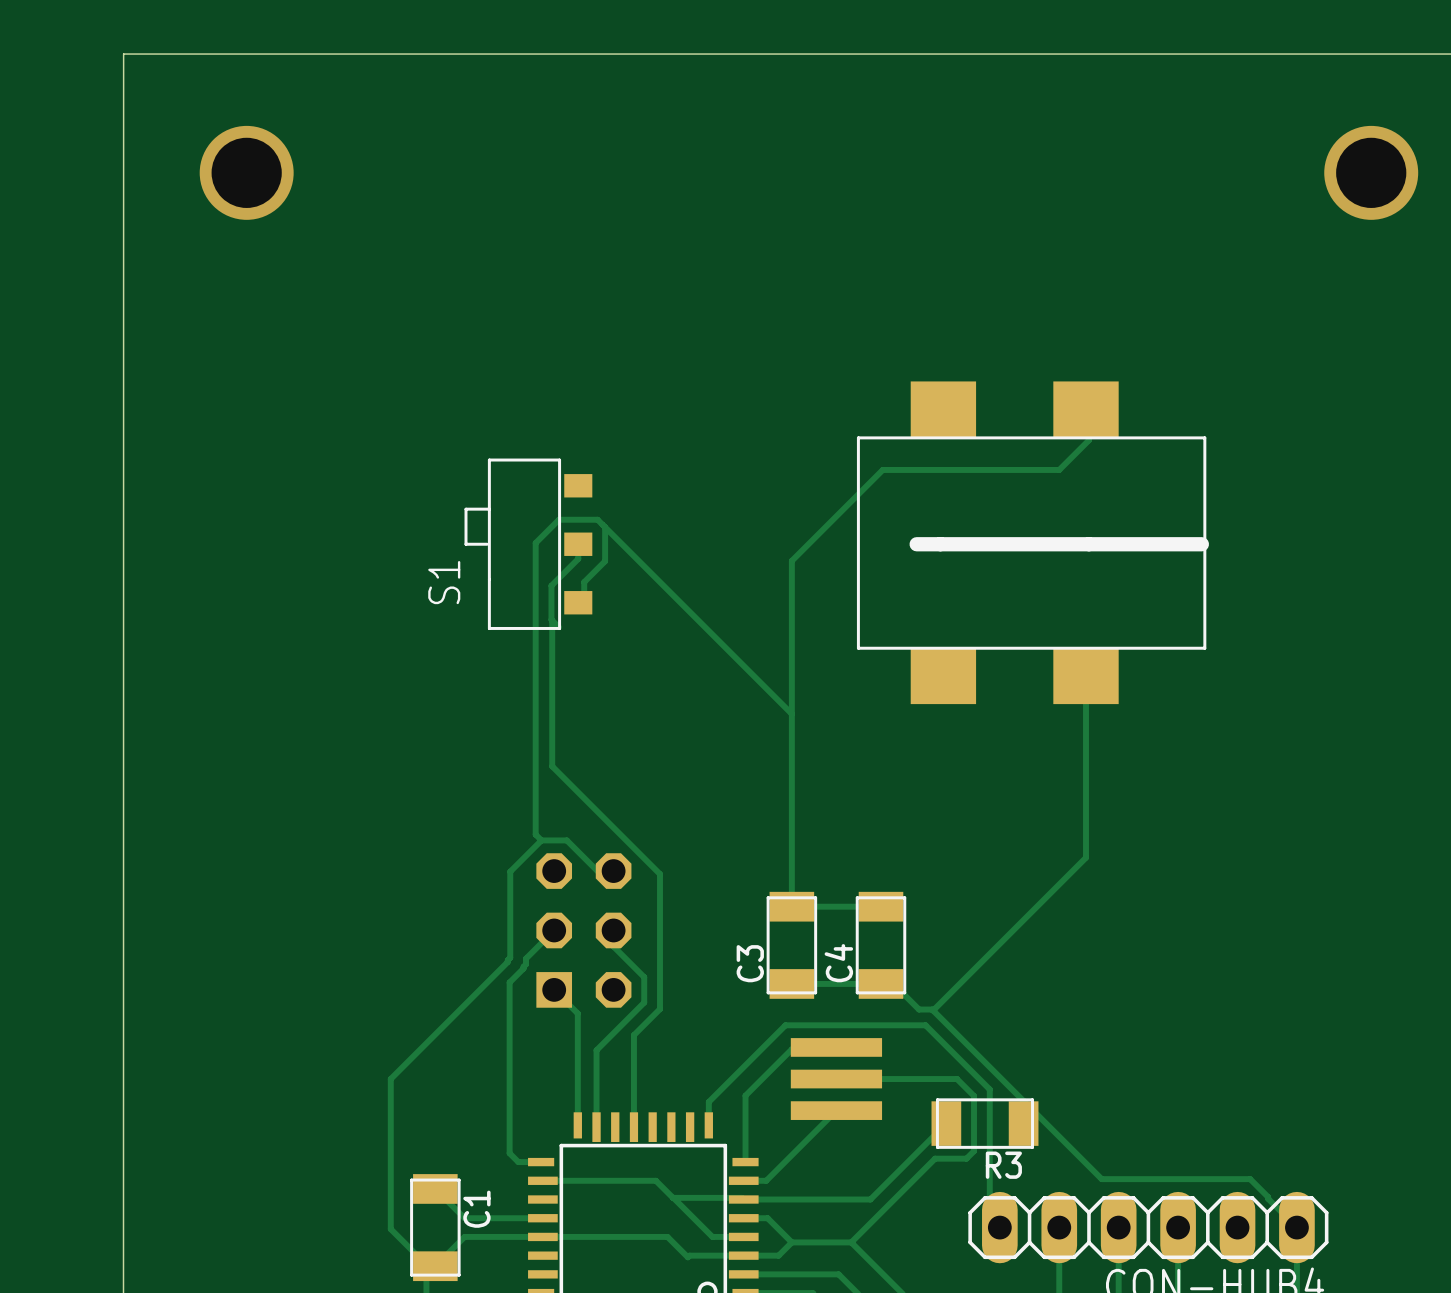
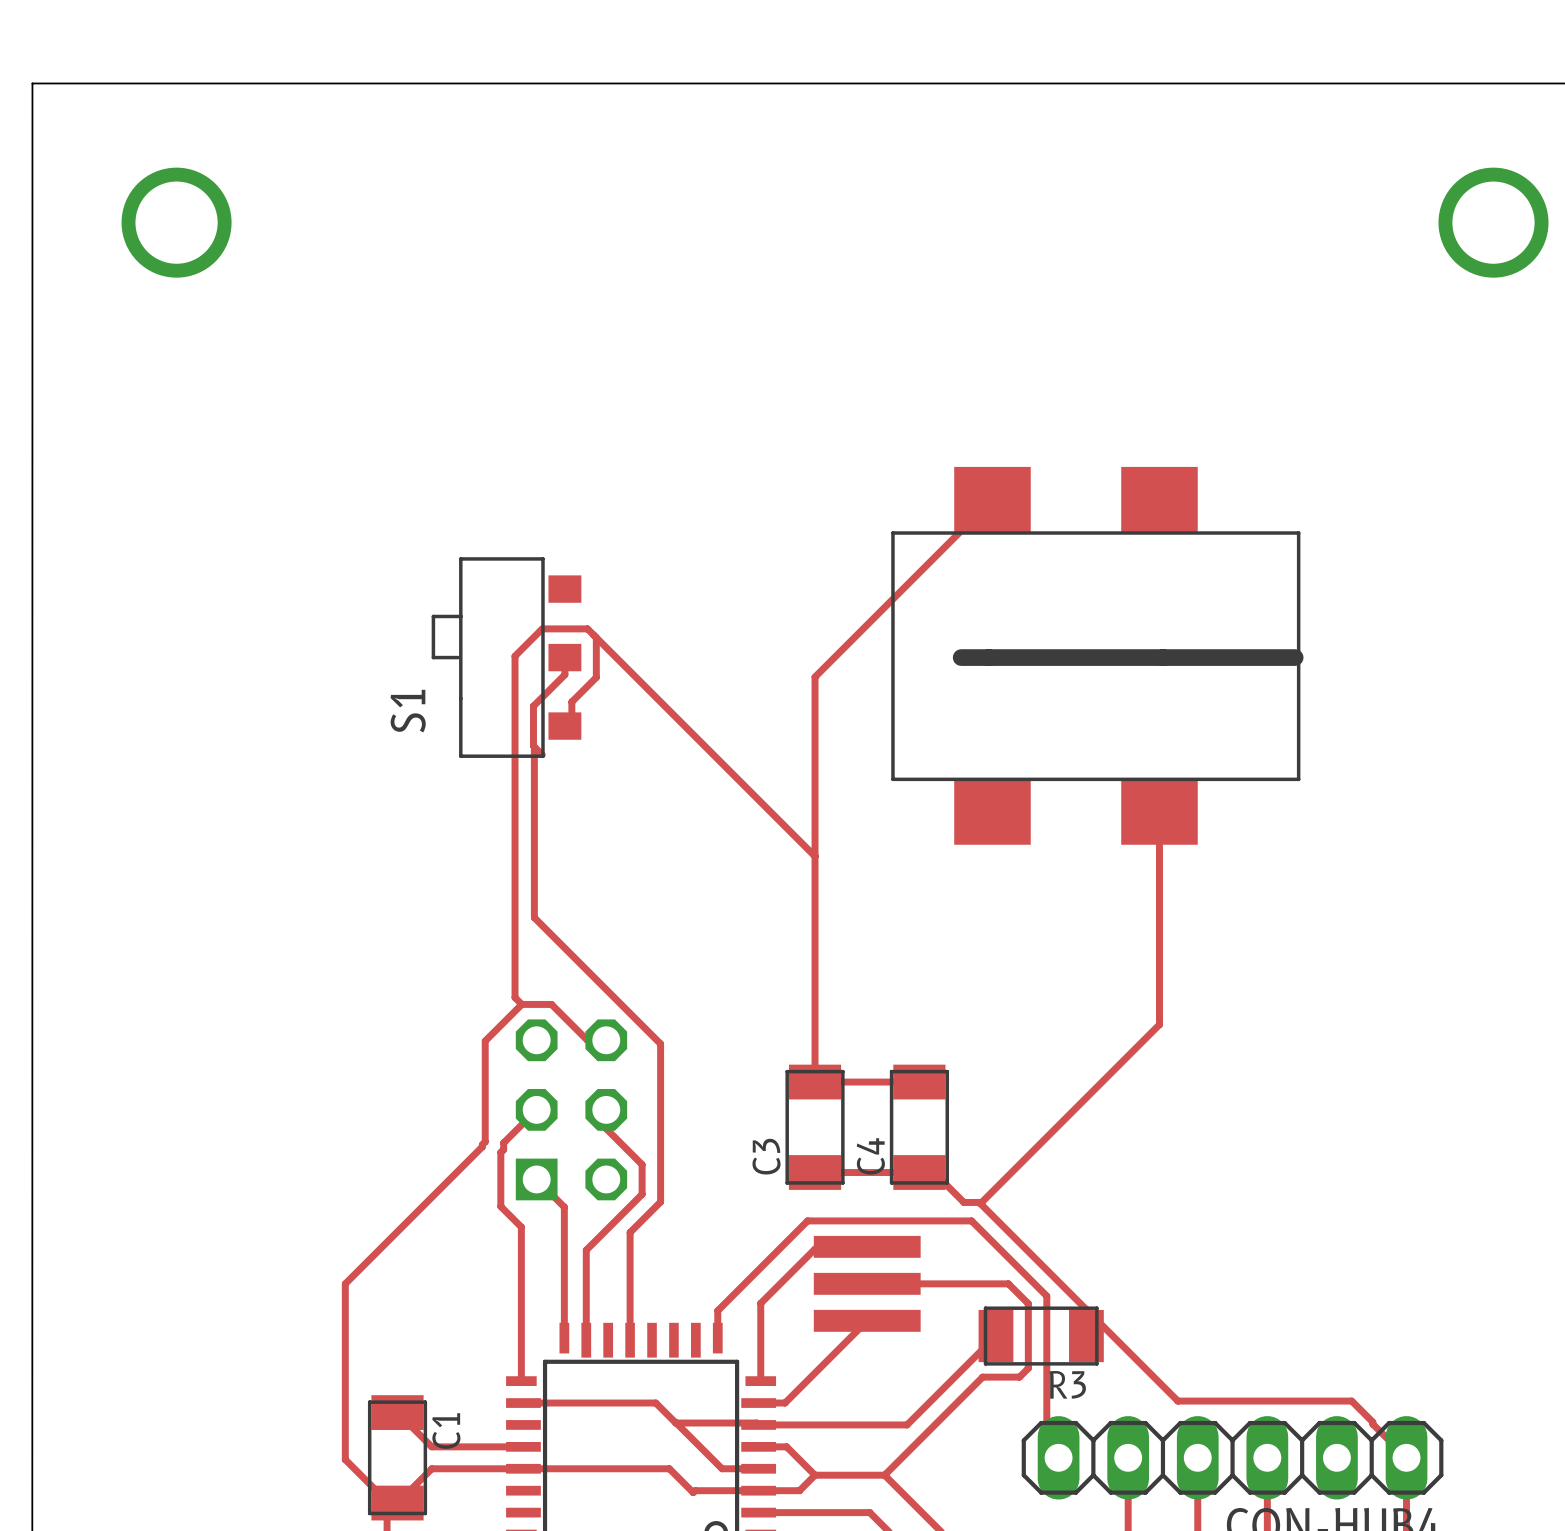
track: (1086, 409) (1088, 412) (1088, 440) (1059, 469) (882, 469) -> (992, 499) (921, 570)
track: (523, 968) (509, 982) (509, 1153) (518, 1162) (541, 1162) -> (500, 1154) (500, 1206) (521, 1227) (521, 1381)

